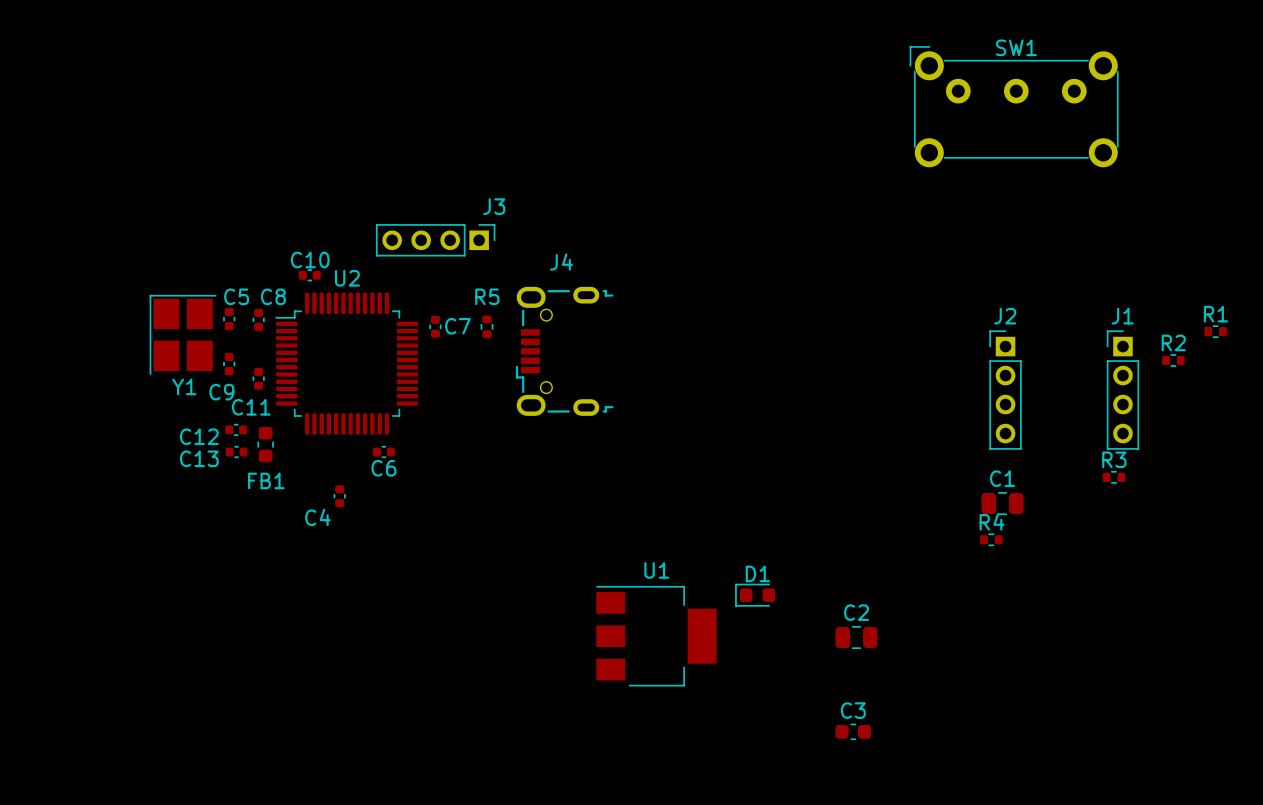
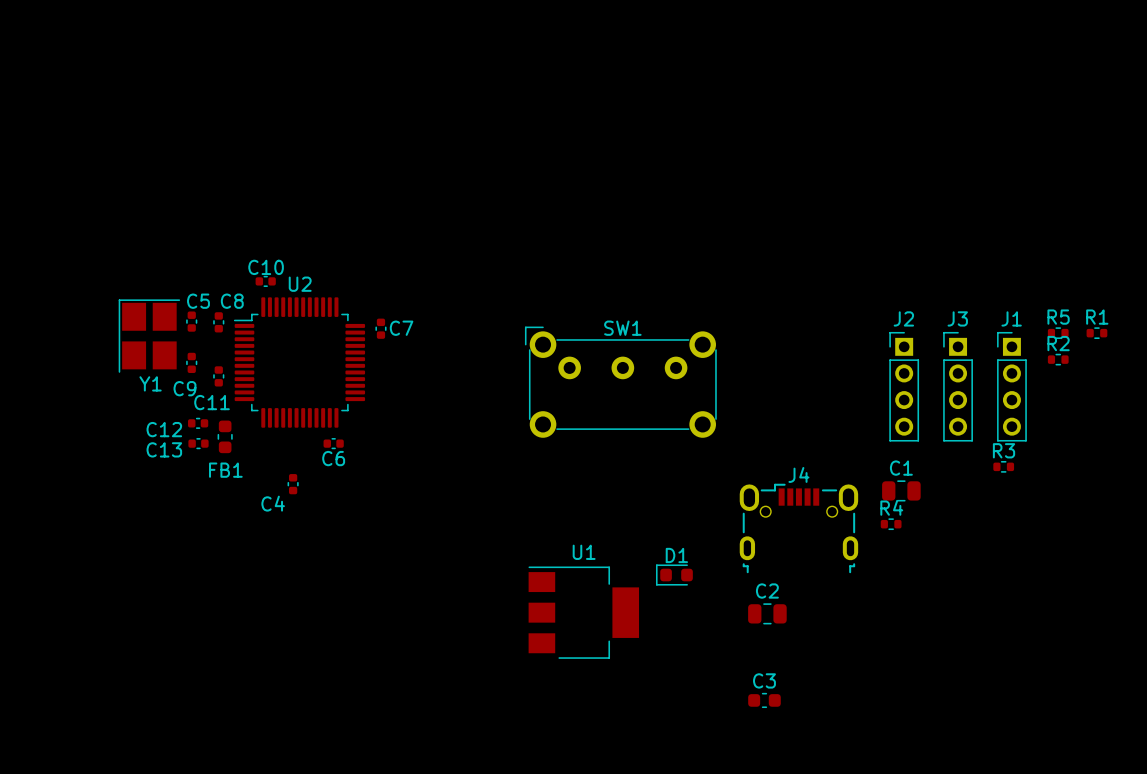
SW1 position: (1014, 106) -> (620, 382)
J3 name position: J3 (494, 206) -> J3 (957, 318)
J3 rotation: 0° (435, 240) -> 90° counterclockwise (958, 386)
J3 position: (435, 240) -> (958, 386)
J4 name position: J4 (561, 262) -> J4 (798, 474)
R5 rotation: 0° (486, 326) -> 90° clockwise (1058, 333)
R5 position: (486, 326) -> (1058, 333)
J4 rotation: 0° (564, 351) -> 90° clockwise (798, 528)
J4 position: (564, 351) -> (798, 528)

